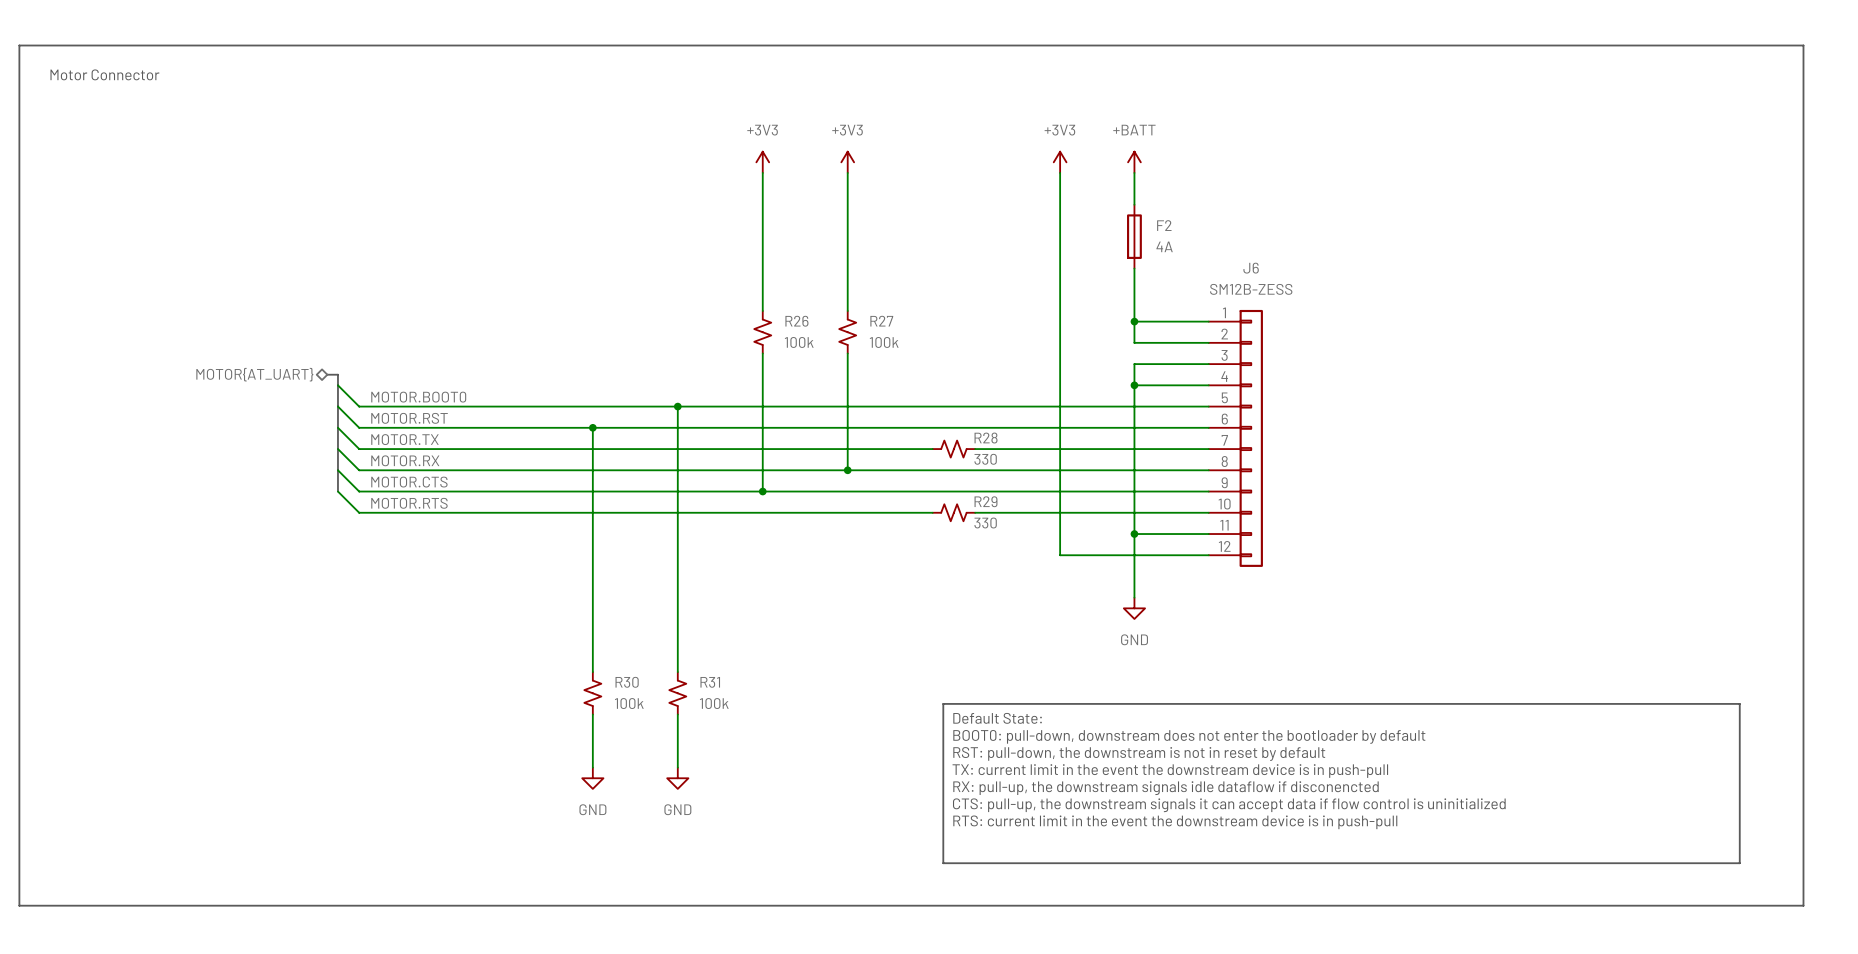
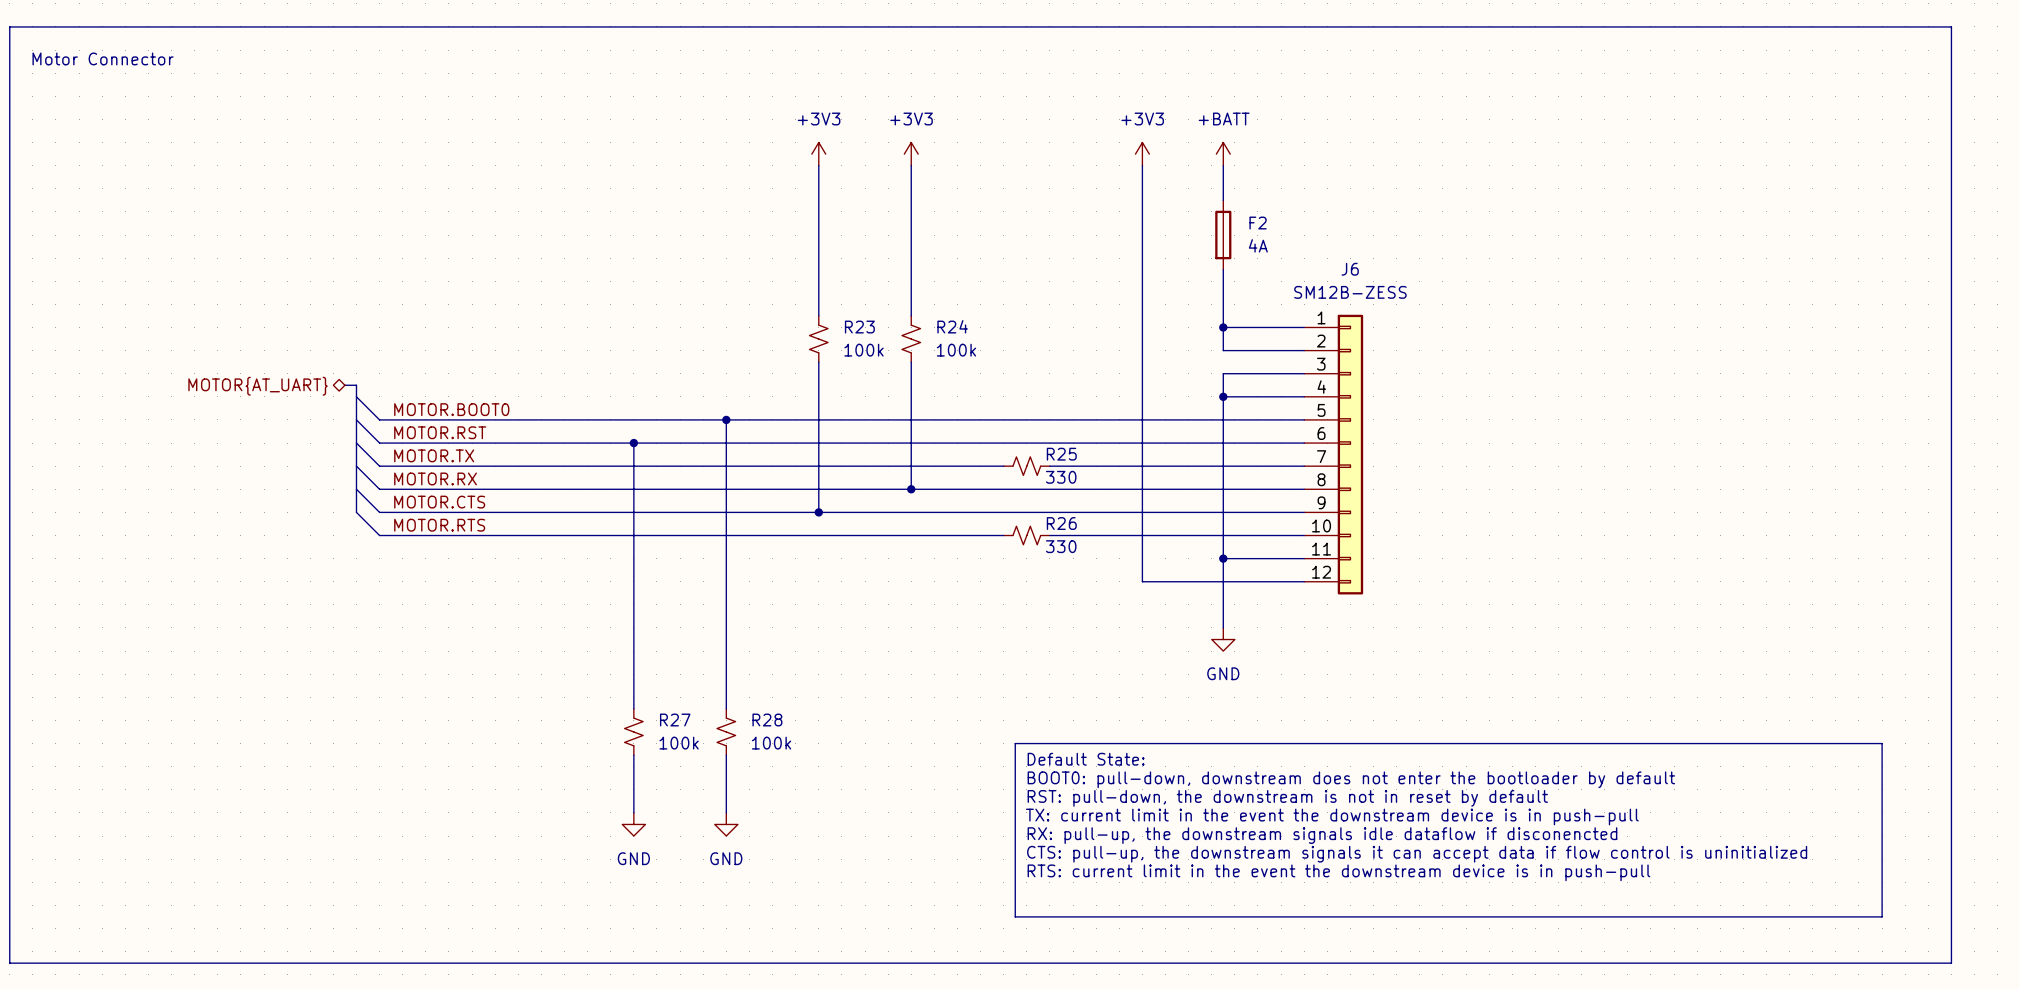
R26 name: R26 (796, 321) -> R23 (859, 327)
R27 name: R27 (881, 321) -> R24 (952, 326)
R28 name: R28 (986, 438) -> R25 (1061, 454)
R29 name: R29 (985, 501) -> R26 (1061, 523)
R30 name: R30 (627, 682) -> R27 (675, 720)
R31 name: R31 (710, 682) -> R28 (767, 720)

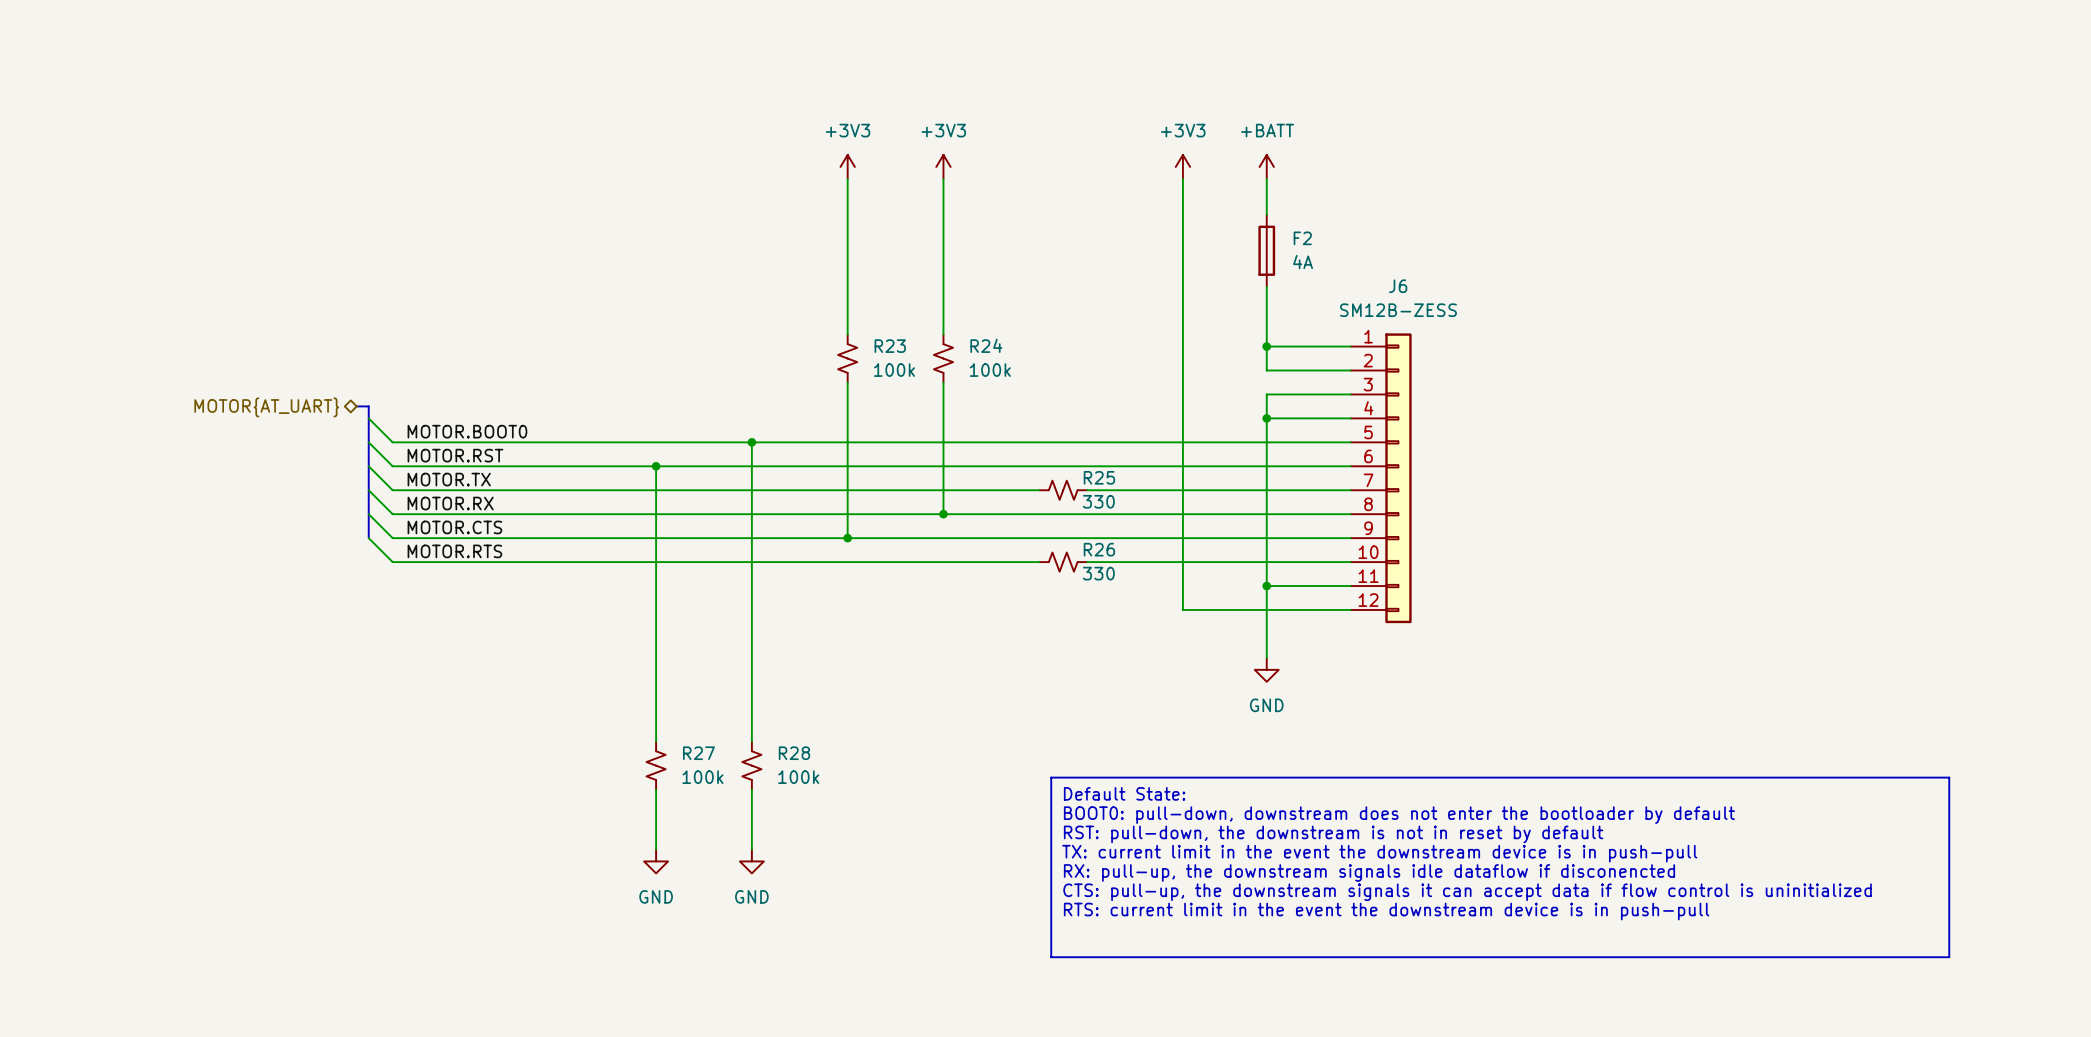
line: (9, 26) (1951, 26) (1951, 963) (9, 963) (9, 26) -> none
text: Motor Connector (103, 58) -> none

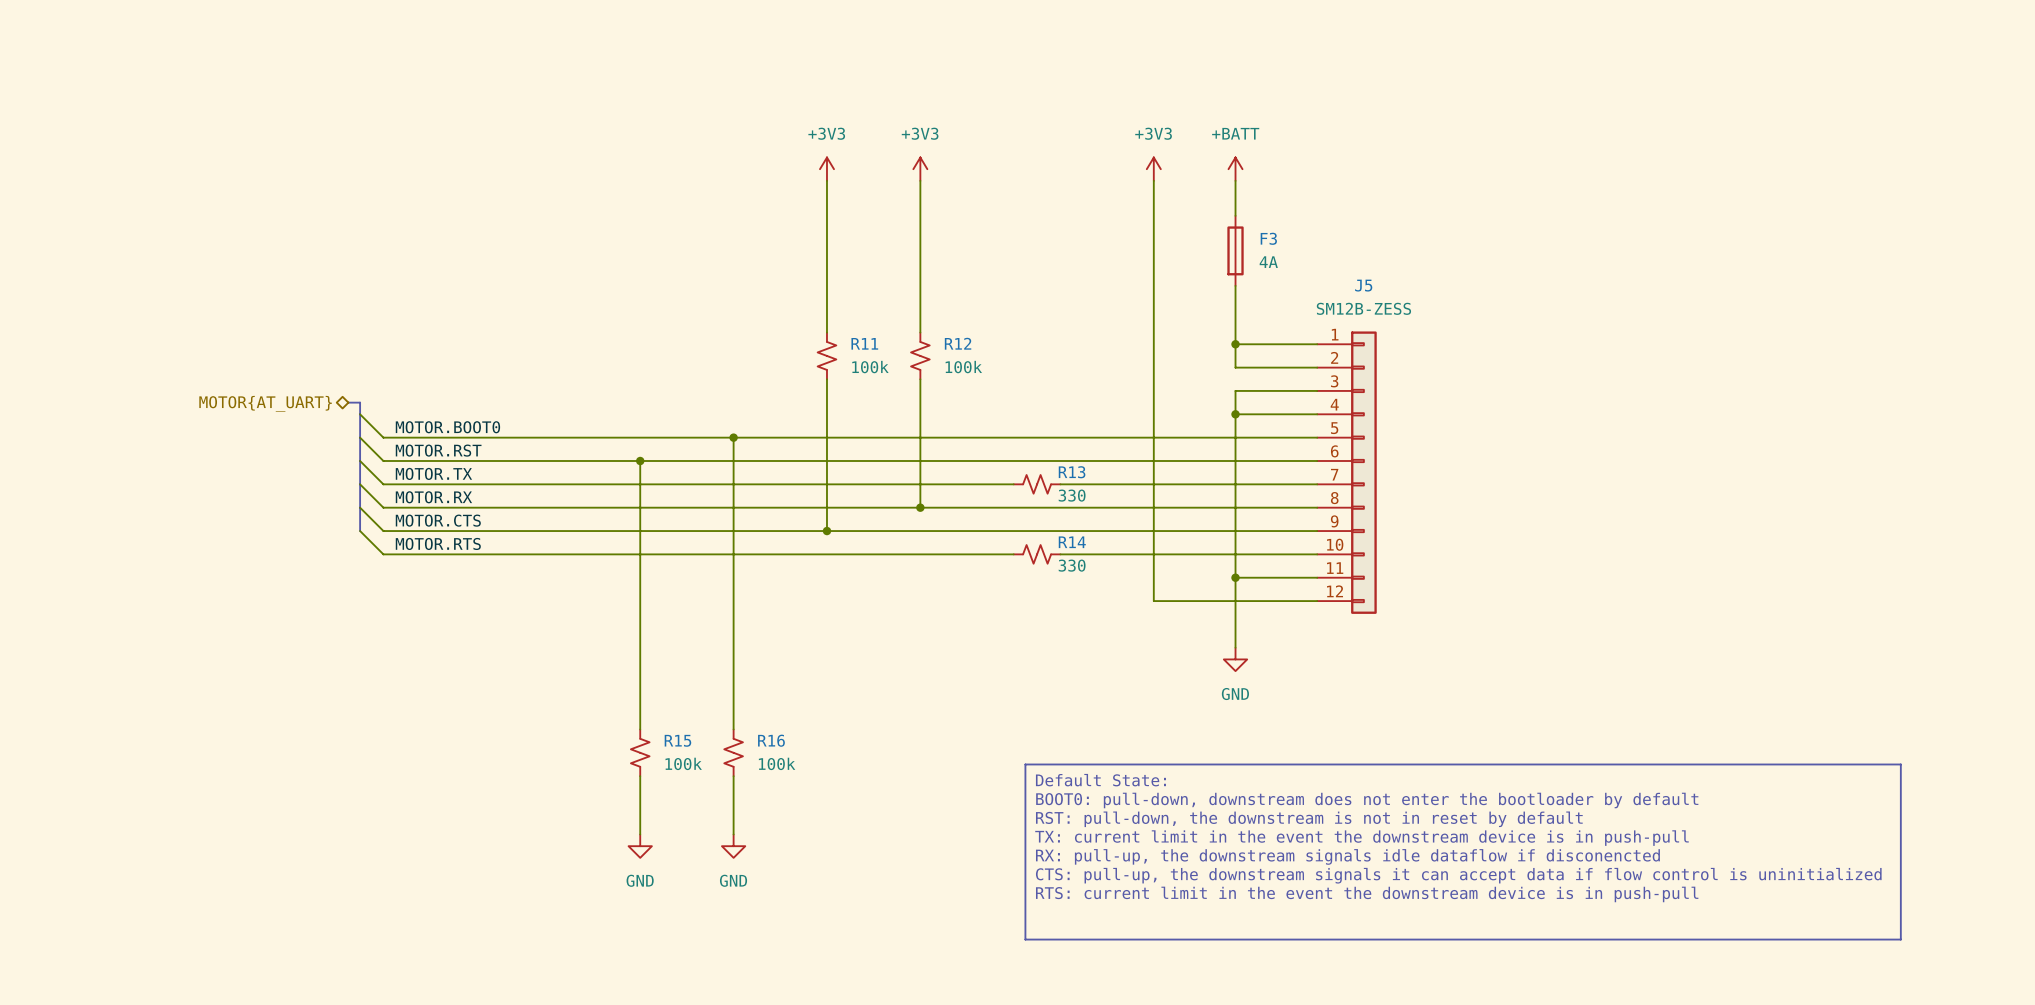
F2 name: F2 (1302, 238) -> F3 (1268, 238)
J6 name: J6 (1398, 286) -> J5 (1363, 285)
R24 name: R24 (986, 345) -> R12 (958, 343)
R23 name: R23 (890, 346) -> R11 (864, 343)
R25 name: R25 (1099, 477) -> R13 (1072, 472)
R26 name: R26 (1099, 549) -> R14 (1072, 542)
R27 name: R27 (698, 753) -> R15 (677, 740)
R28 name: R28 (794, 753) -> R16 (771, 740)

